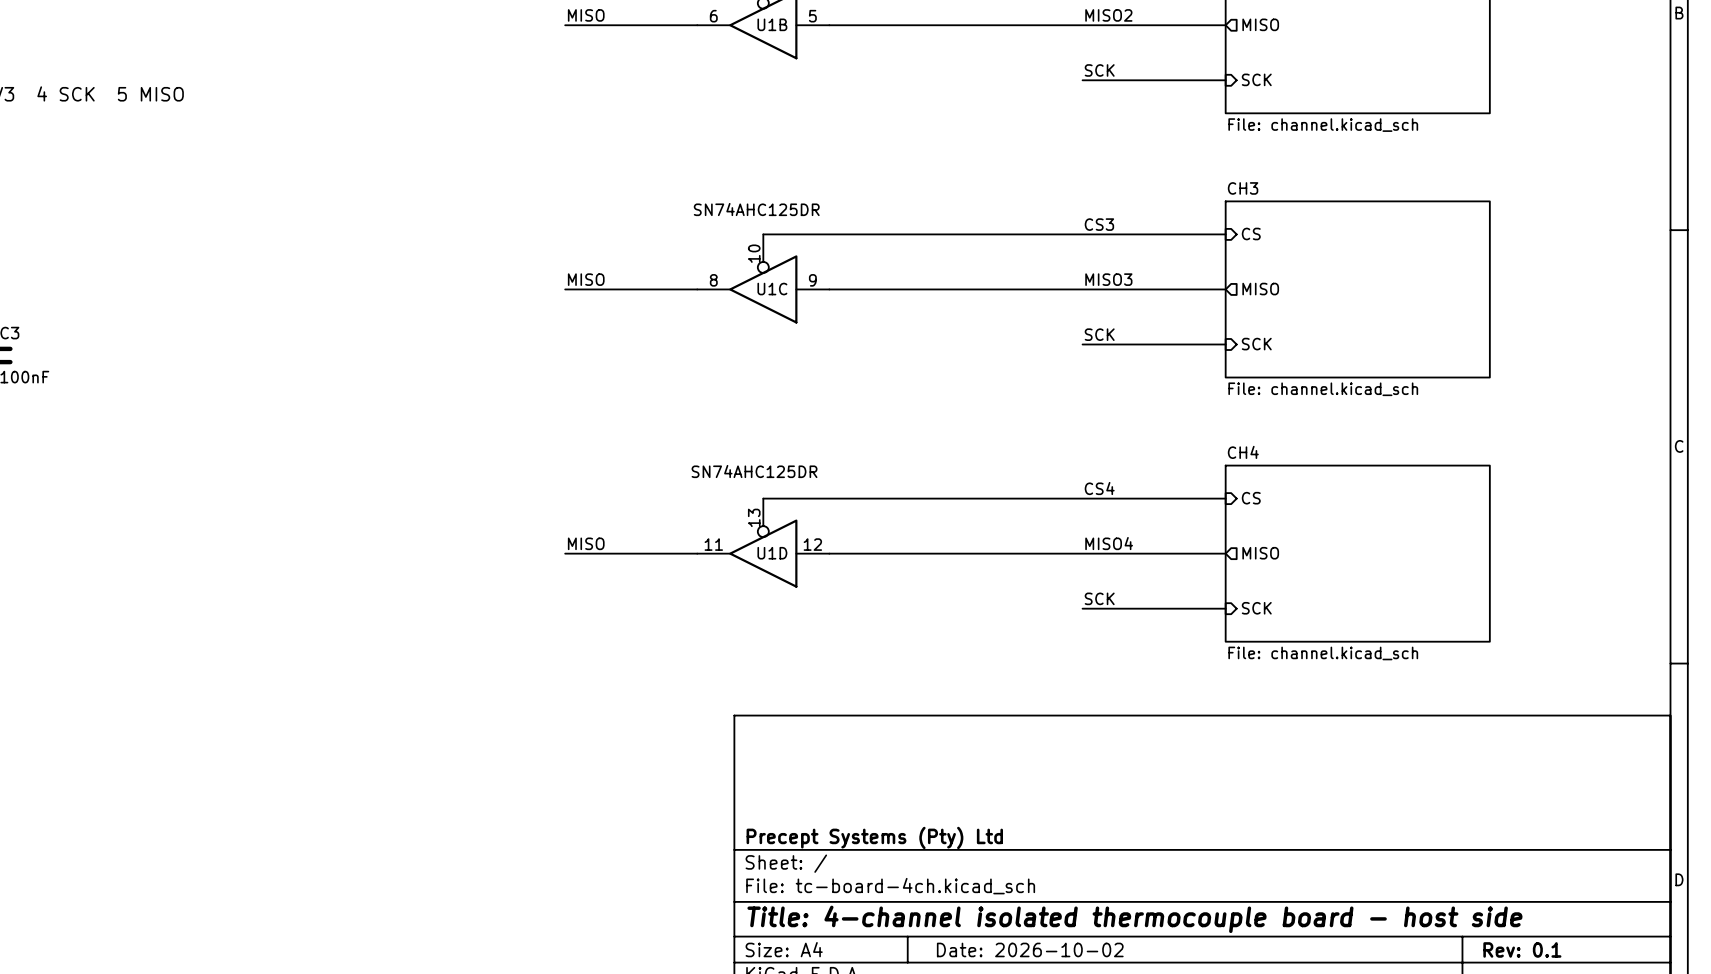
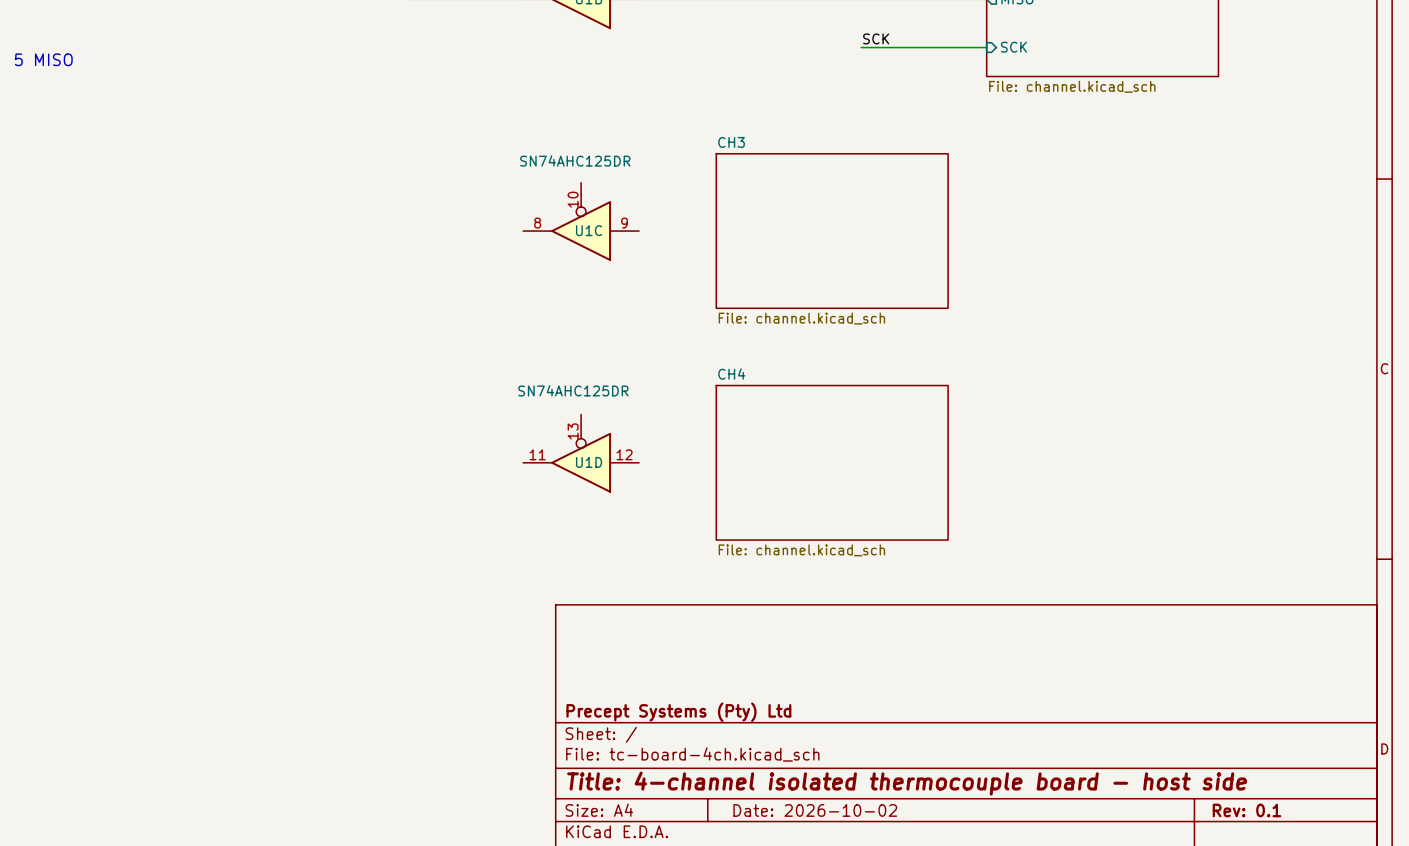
label: CS3 (1099, 224) -> none
sheet pin: CS (1251, 233) -> none
wire: (763, 234) (1225, 234) -> none
label: MISO (586, 279) -> none
label: MISO3 (1108, 279) -> none
wire: (565, 289) (697, 289) -> none
wire: (829, 289) (1225, 289) -> none
sheet pin: MISO (1260, 289) -> none
sheet CH3 position: (1357, 289) -> (832, 231)
label: SCK (1099, 334) -> none
wire: (1082, 344) (1225, 344) -> none
sheet pin: SCK (1256, 344) -> none
label: CS4 (1099, 488) -> none
wire: (763, 498) (1225, 498) -> none
sheet pin: CS (1251, 498) -> none
label: MISO (586, 543) -> none
label: MISO4 (1109, 543) -> none
wire: (565, 553) (697, 553) -> none
wire: (829, 553) (1225, 553) -> none
sheet pin: MISO (1260, 553) -> none
sheet CH4 position: (1357, 553) -> (832, 462)
label: SCK (1099, 598) -> none
wire: (1082, 608) (1225, 608) -> none
sheet pin: SCK (1256, 608) -> none

